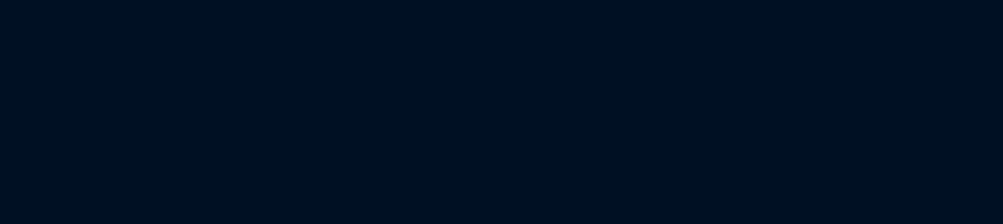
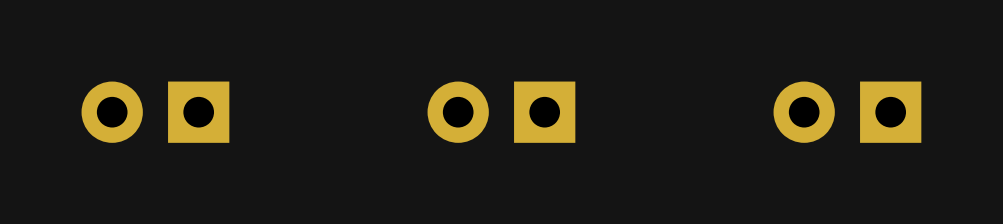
part: none -> (155, 112)
part: none -> (501, 112)
part: none -> (847, 112)

